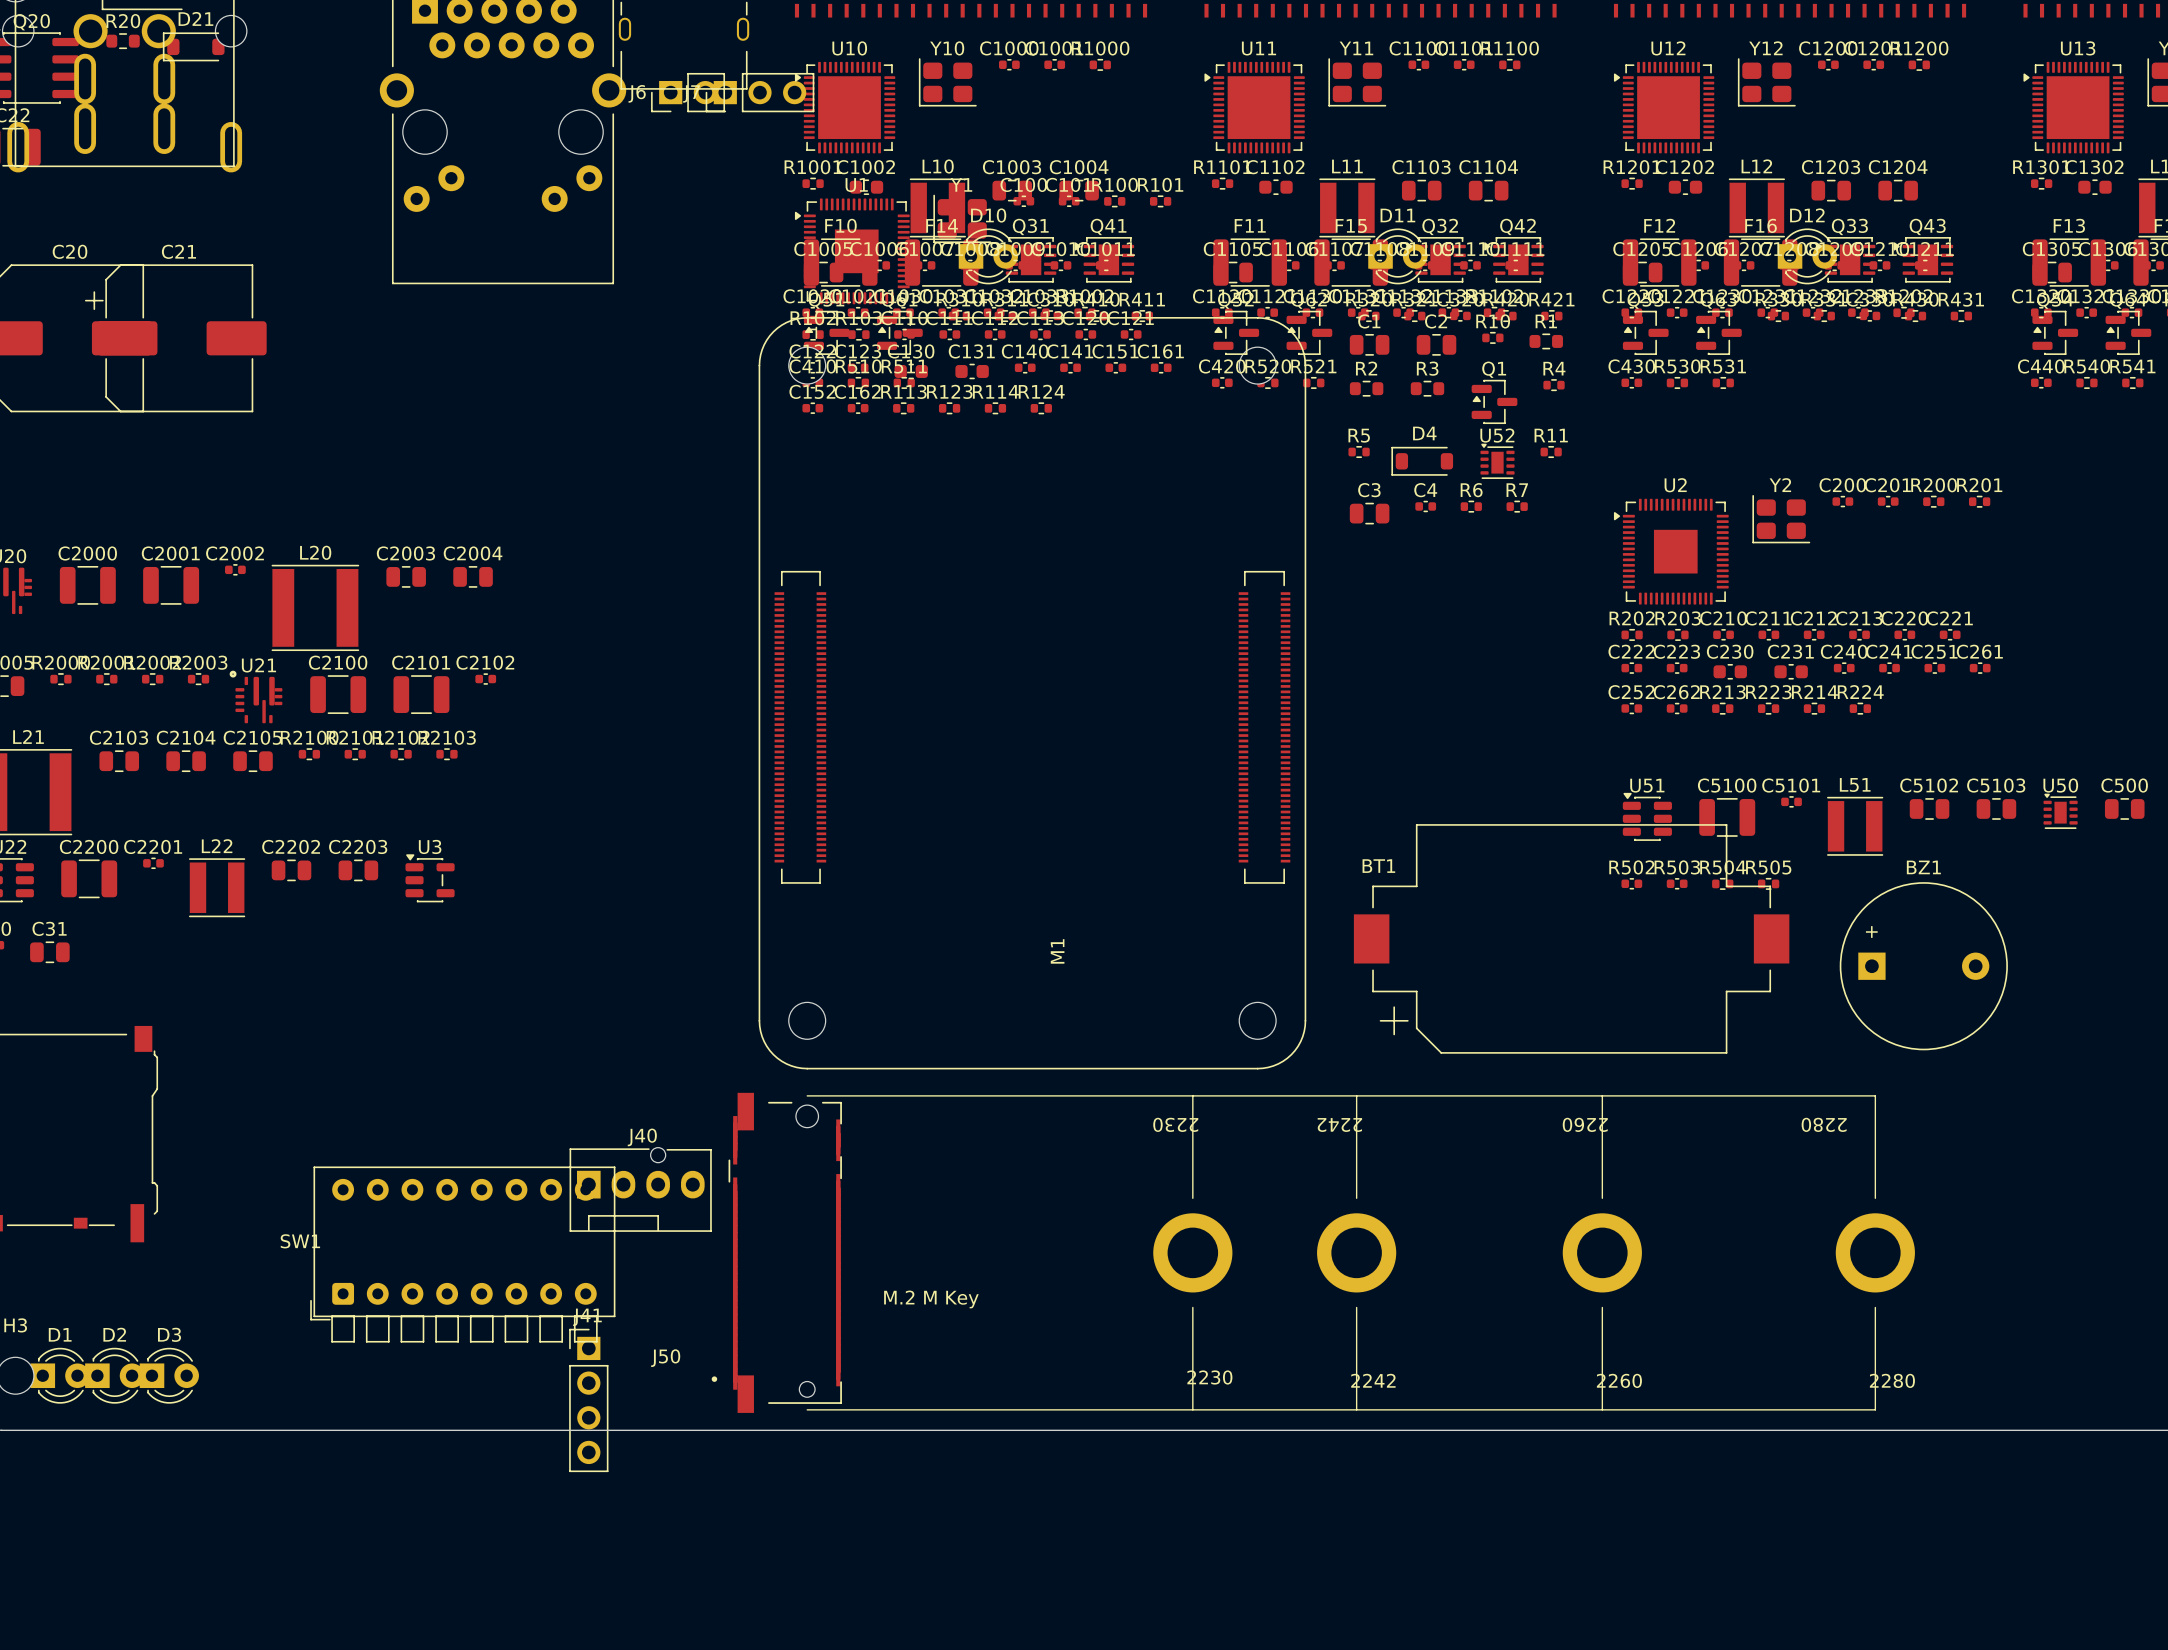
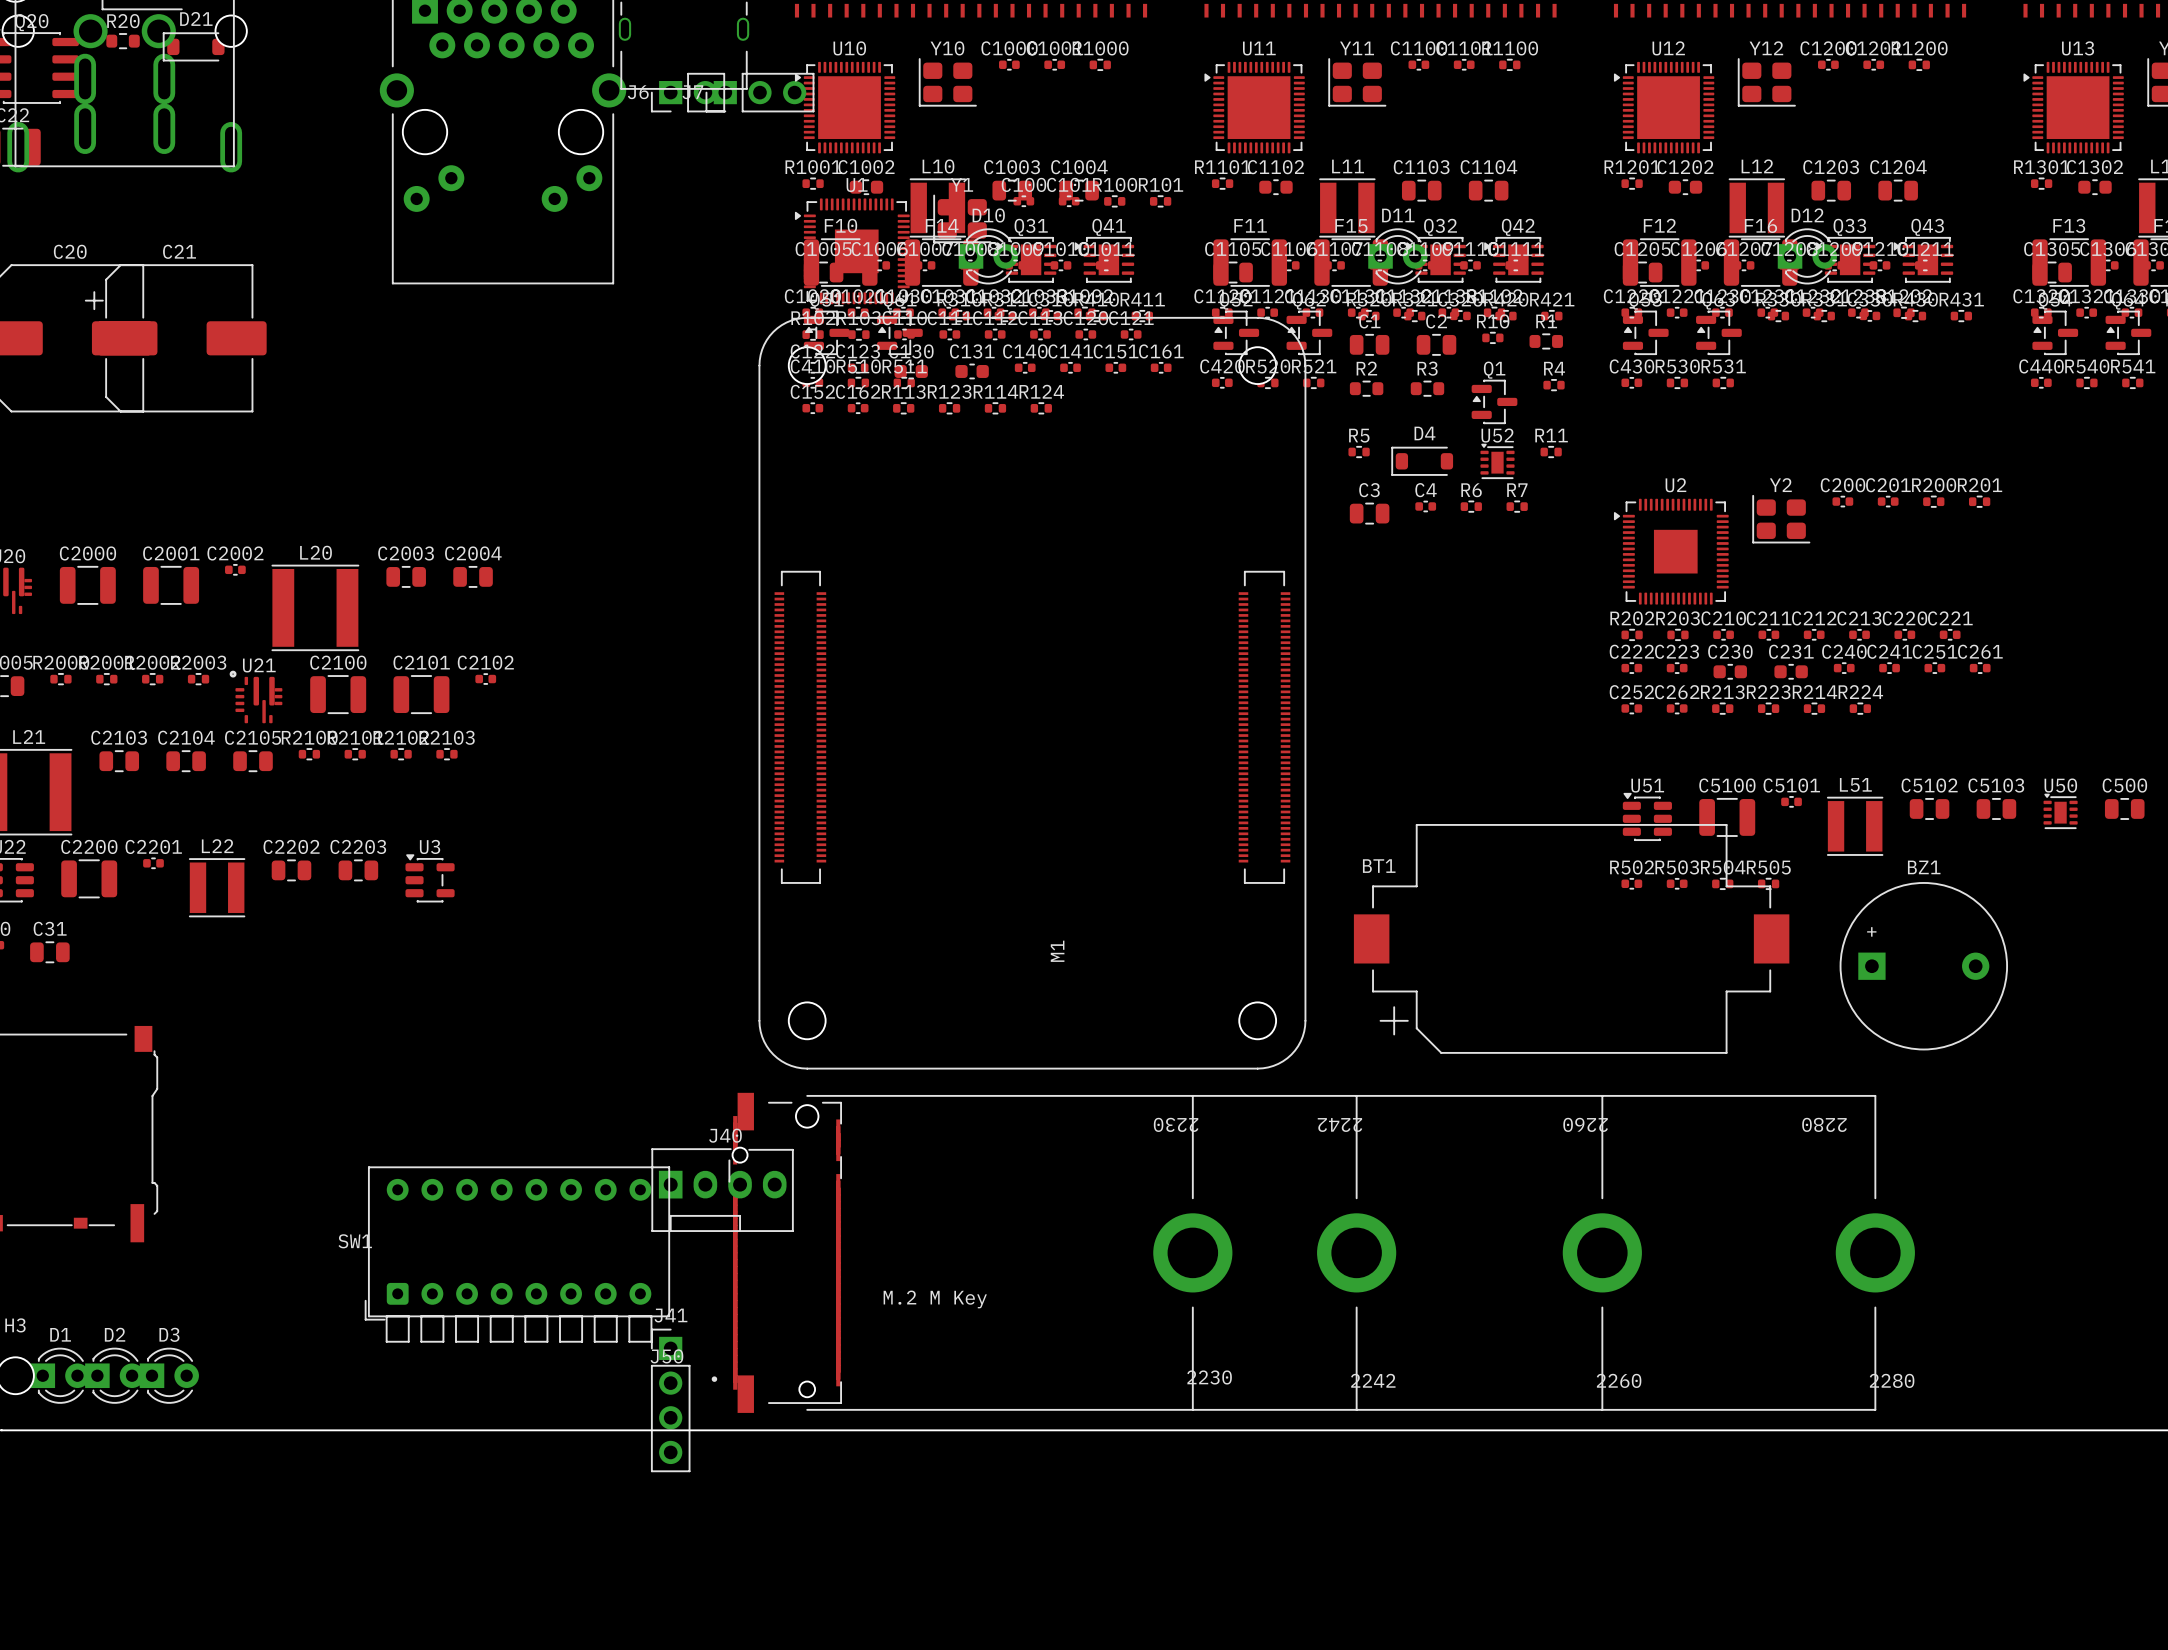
J40 position: (640, 1189) -> (722, 1189)
SW1 position: (462, 1254) -> (517, 1254)
J41 position: (588, 1400) -> (670, 1400)

